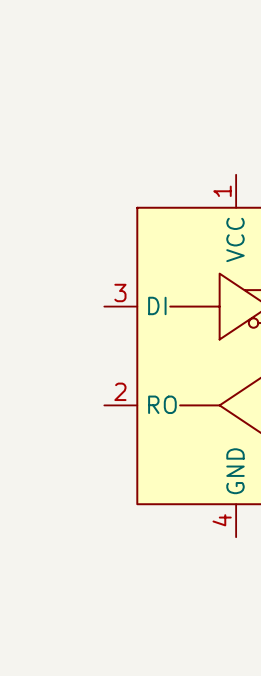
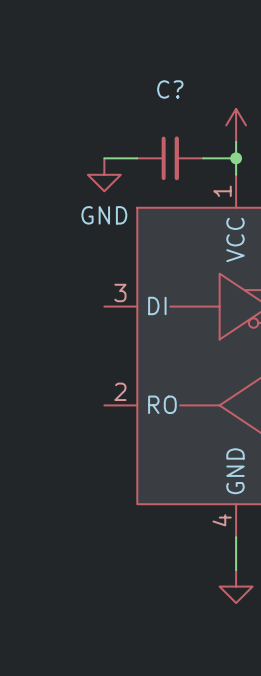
power symbol: none -> (236, 125)
wire: none -> (236, 141) (236, 174)
wire: none -> (104, 158) (137, 158)
C?: none -> (170, 158)
wire: none -> (203, 158) (236, 158)
junction: none -> (236, 158)
power symbol: none -> GND (104, 174)
wire: none -> (236, 537) (236, 570)
power symbol: none -> (236, 586)

